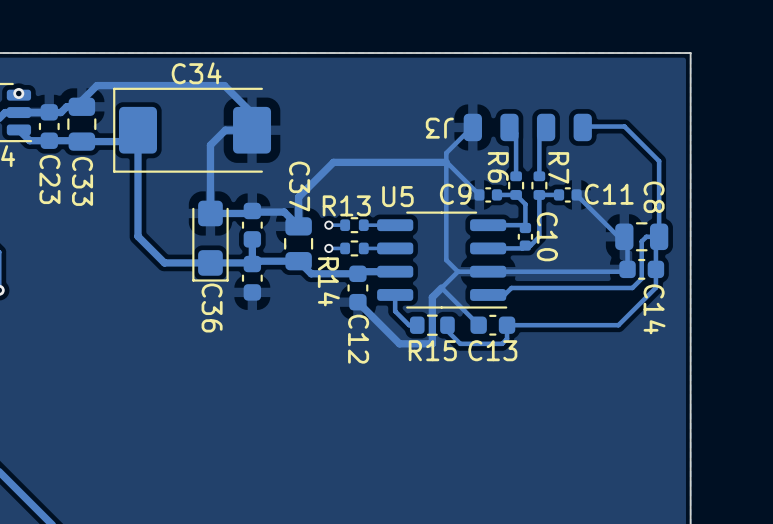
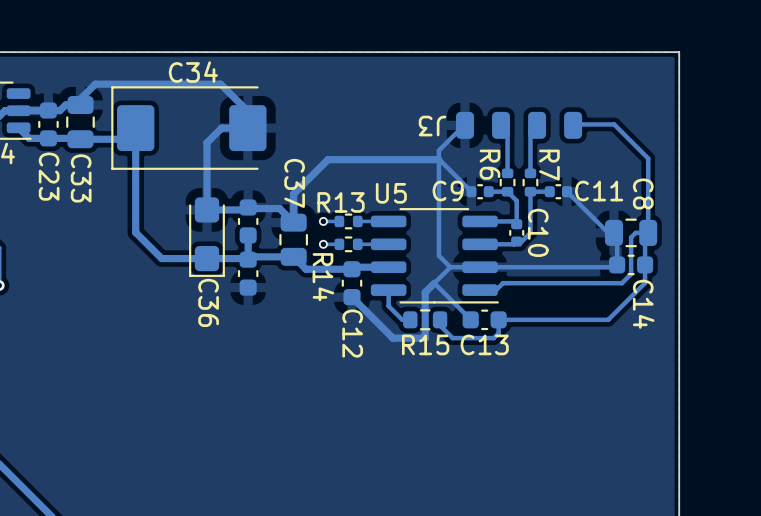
via: (18, 93) -> none

